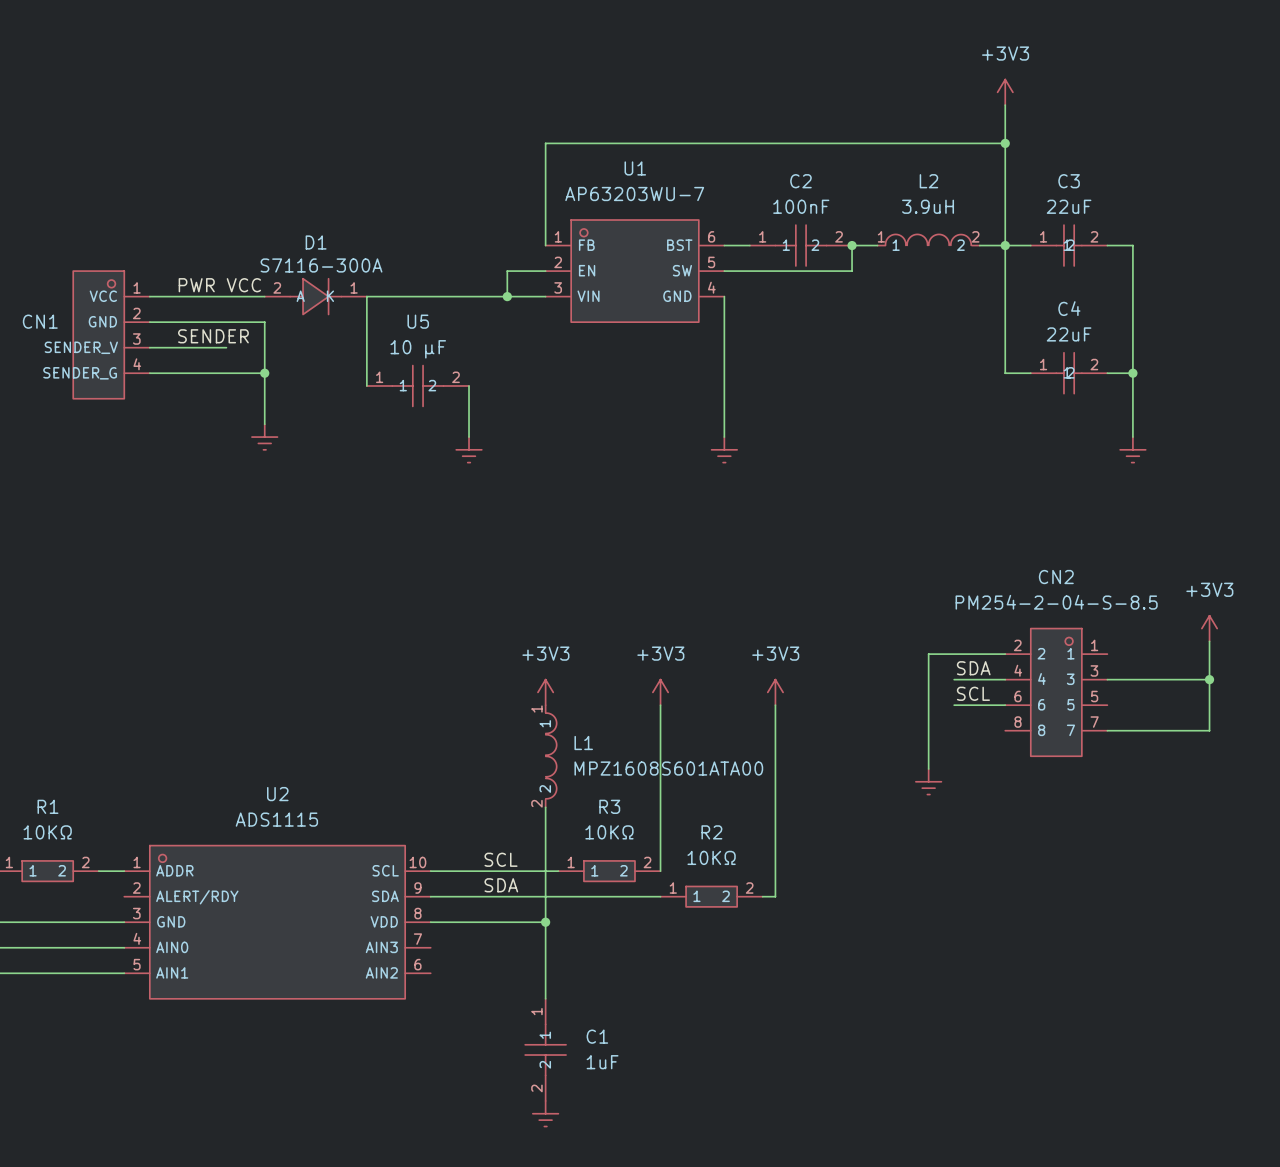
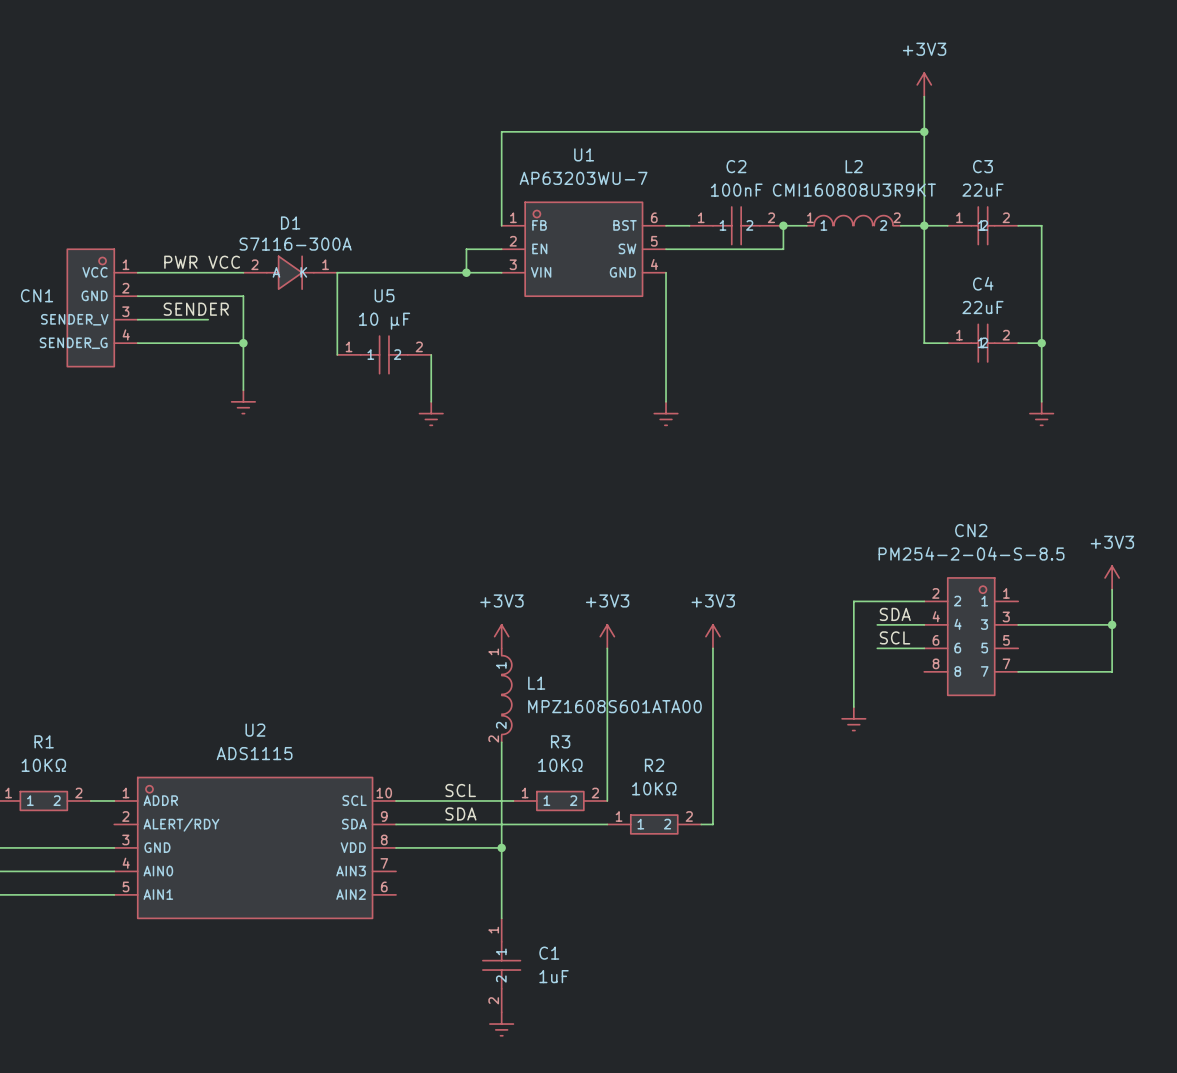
L2 value: 3.9uH (928, 206) -> CMI160808U3R9KT (854, 190)

